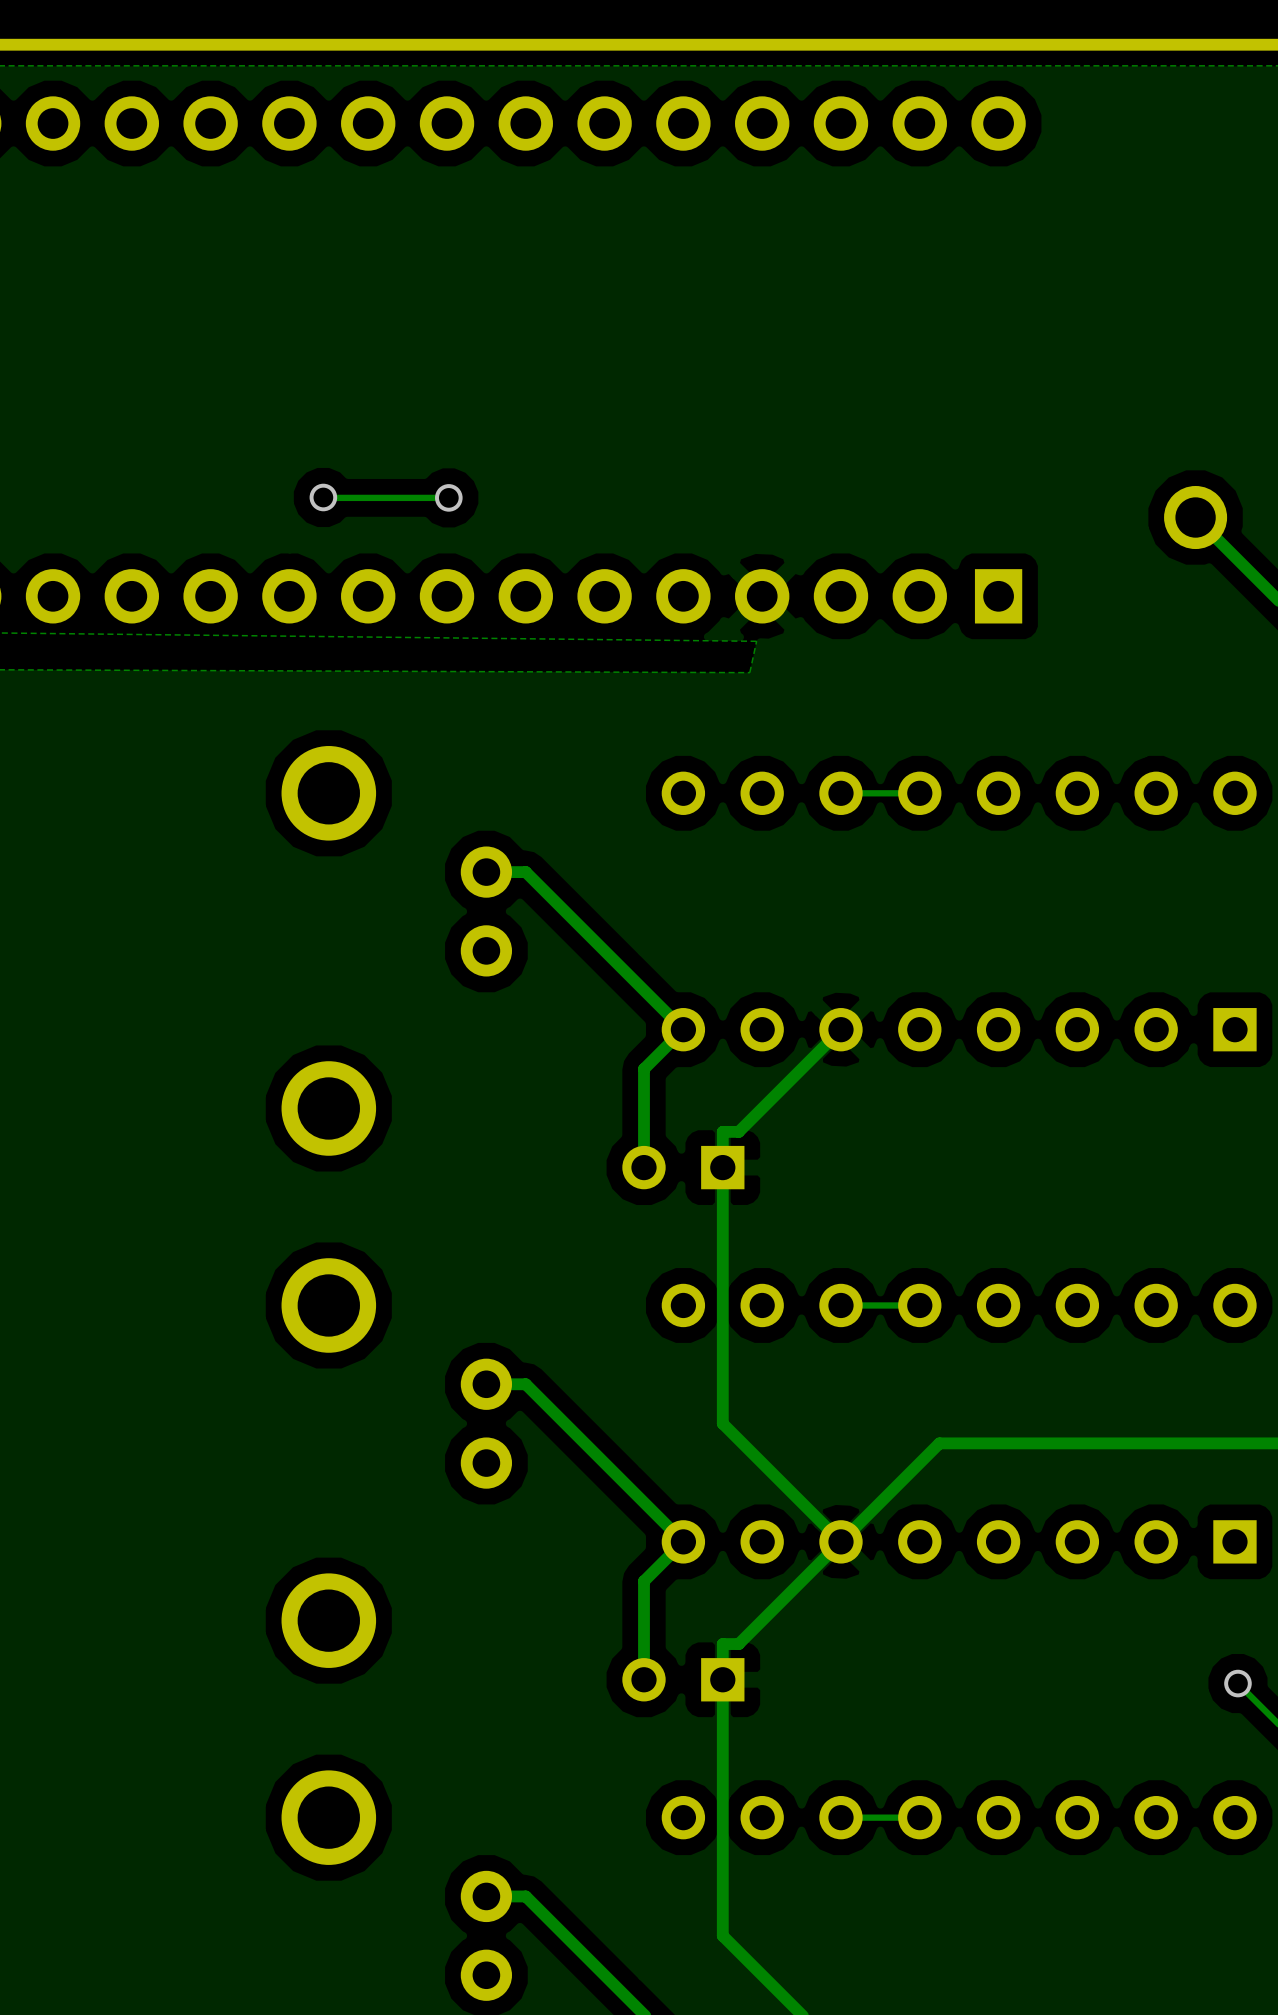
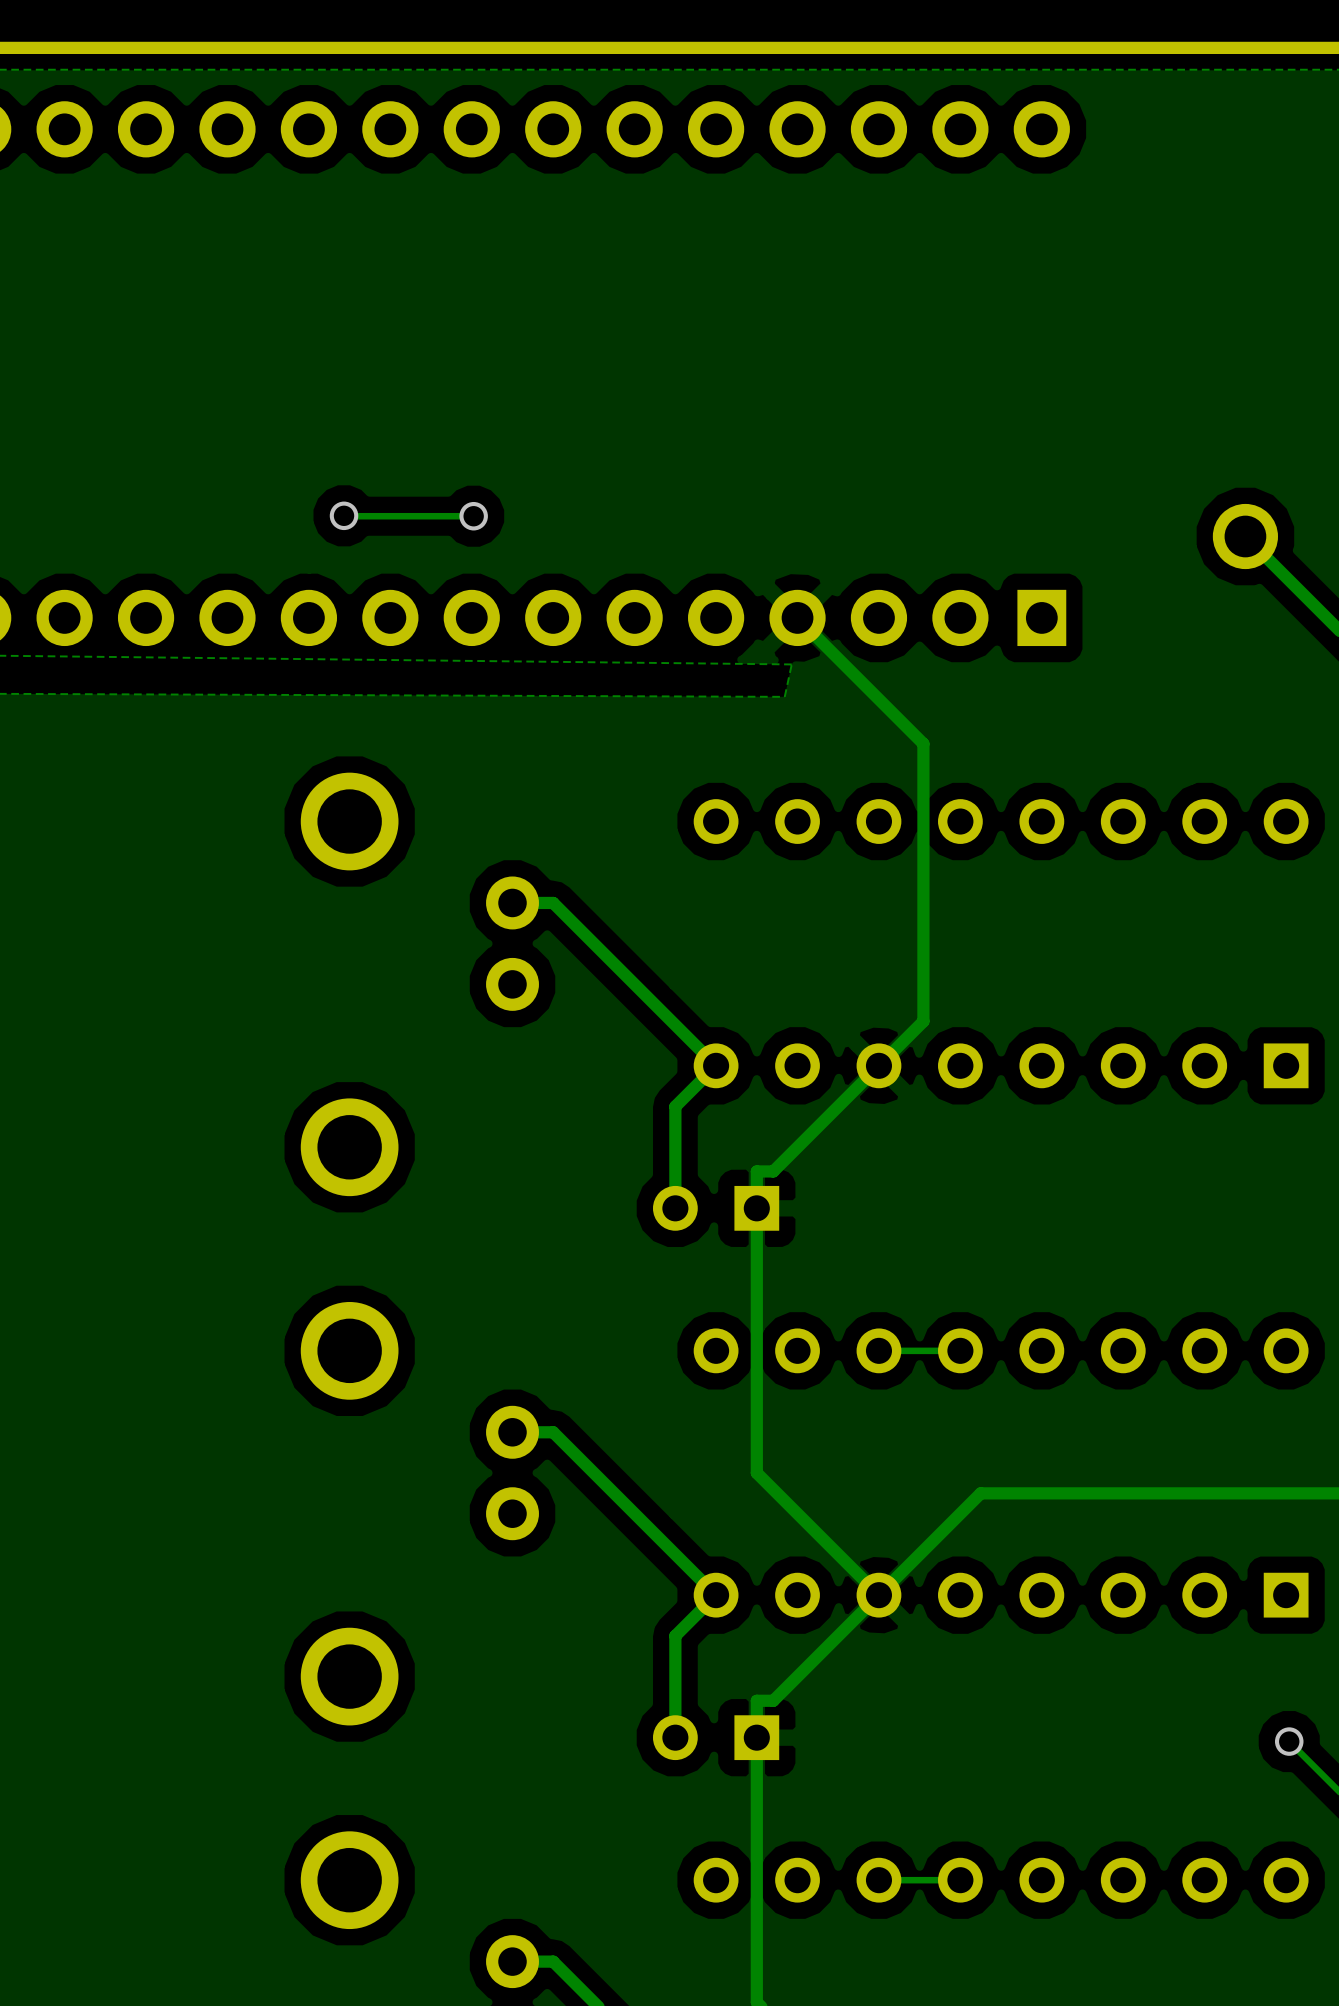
track: none -> (797, 617) (923, 743) (923, 1021) (878, 1065)
track: (919, 793) (840, 793) -> none

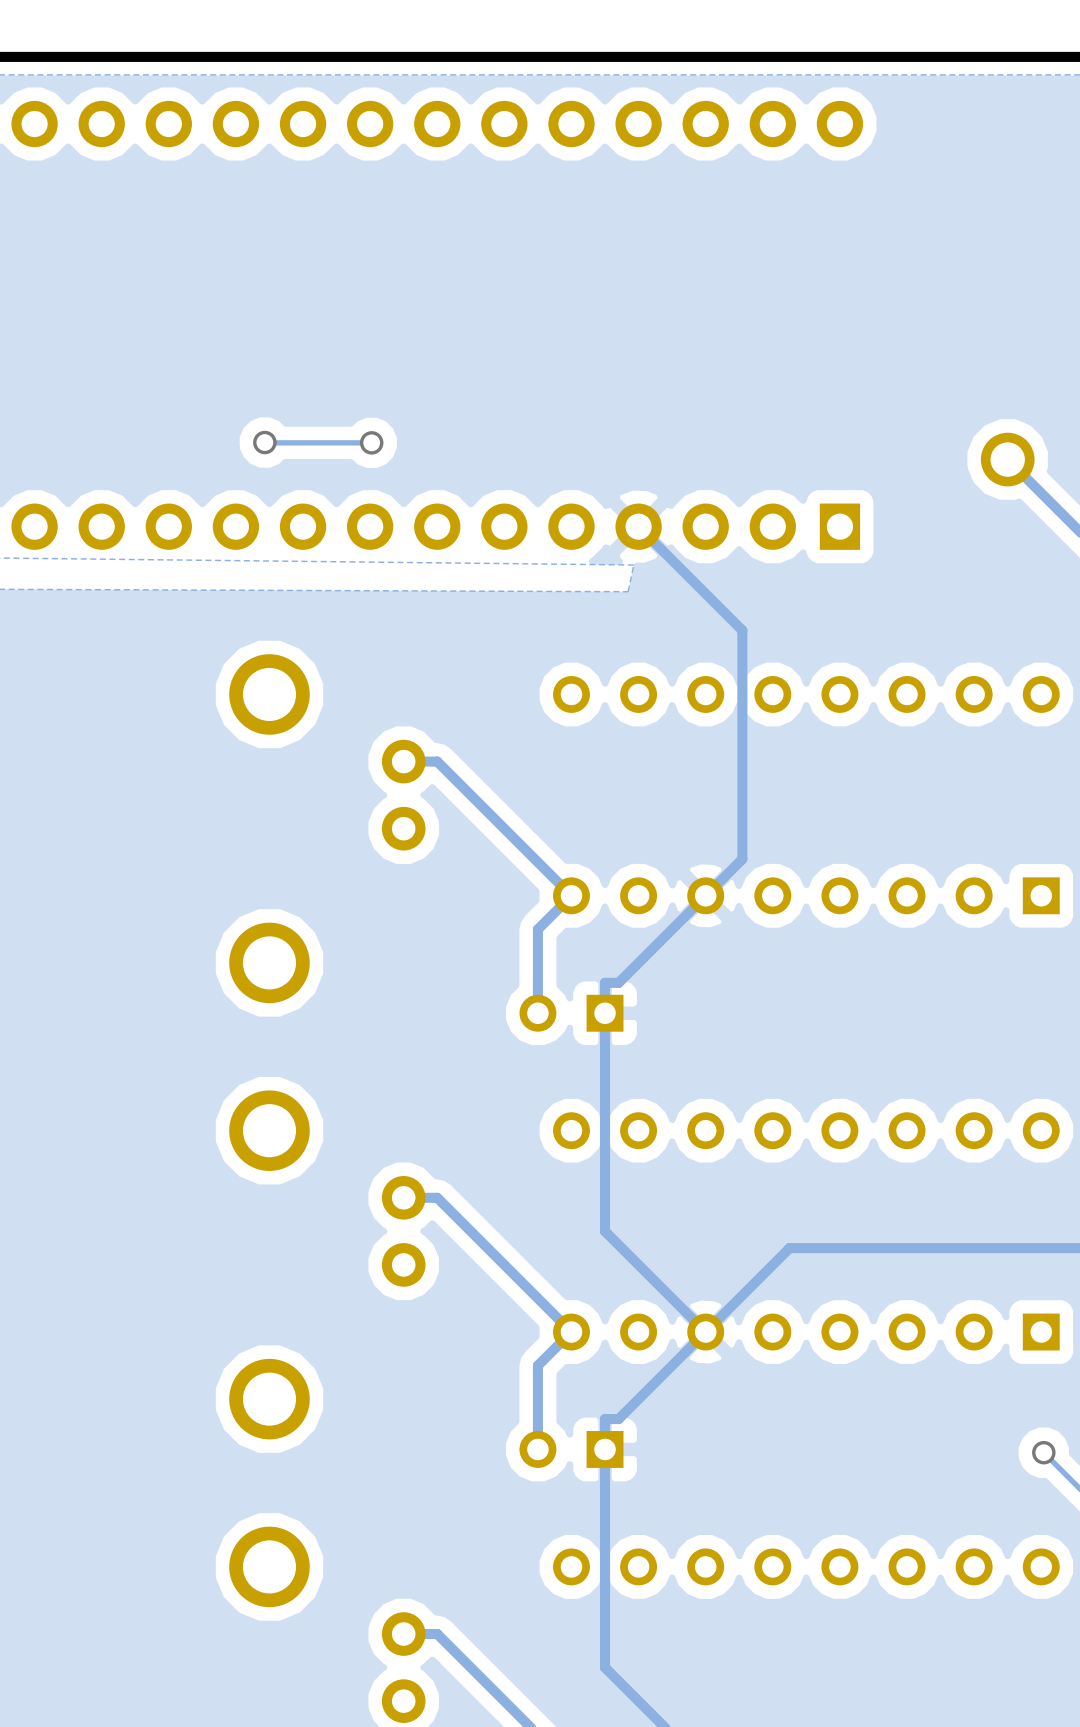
track: (960, 1350) (878, 1350) -> none
track: (960, 1880) (878, 1880) -> none

